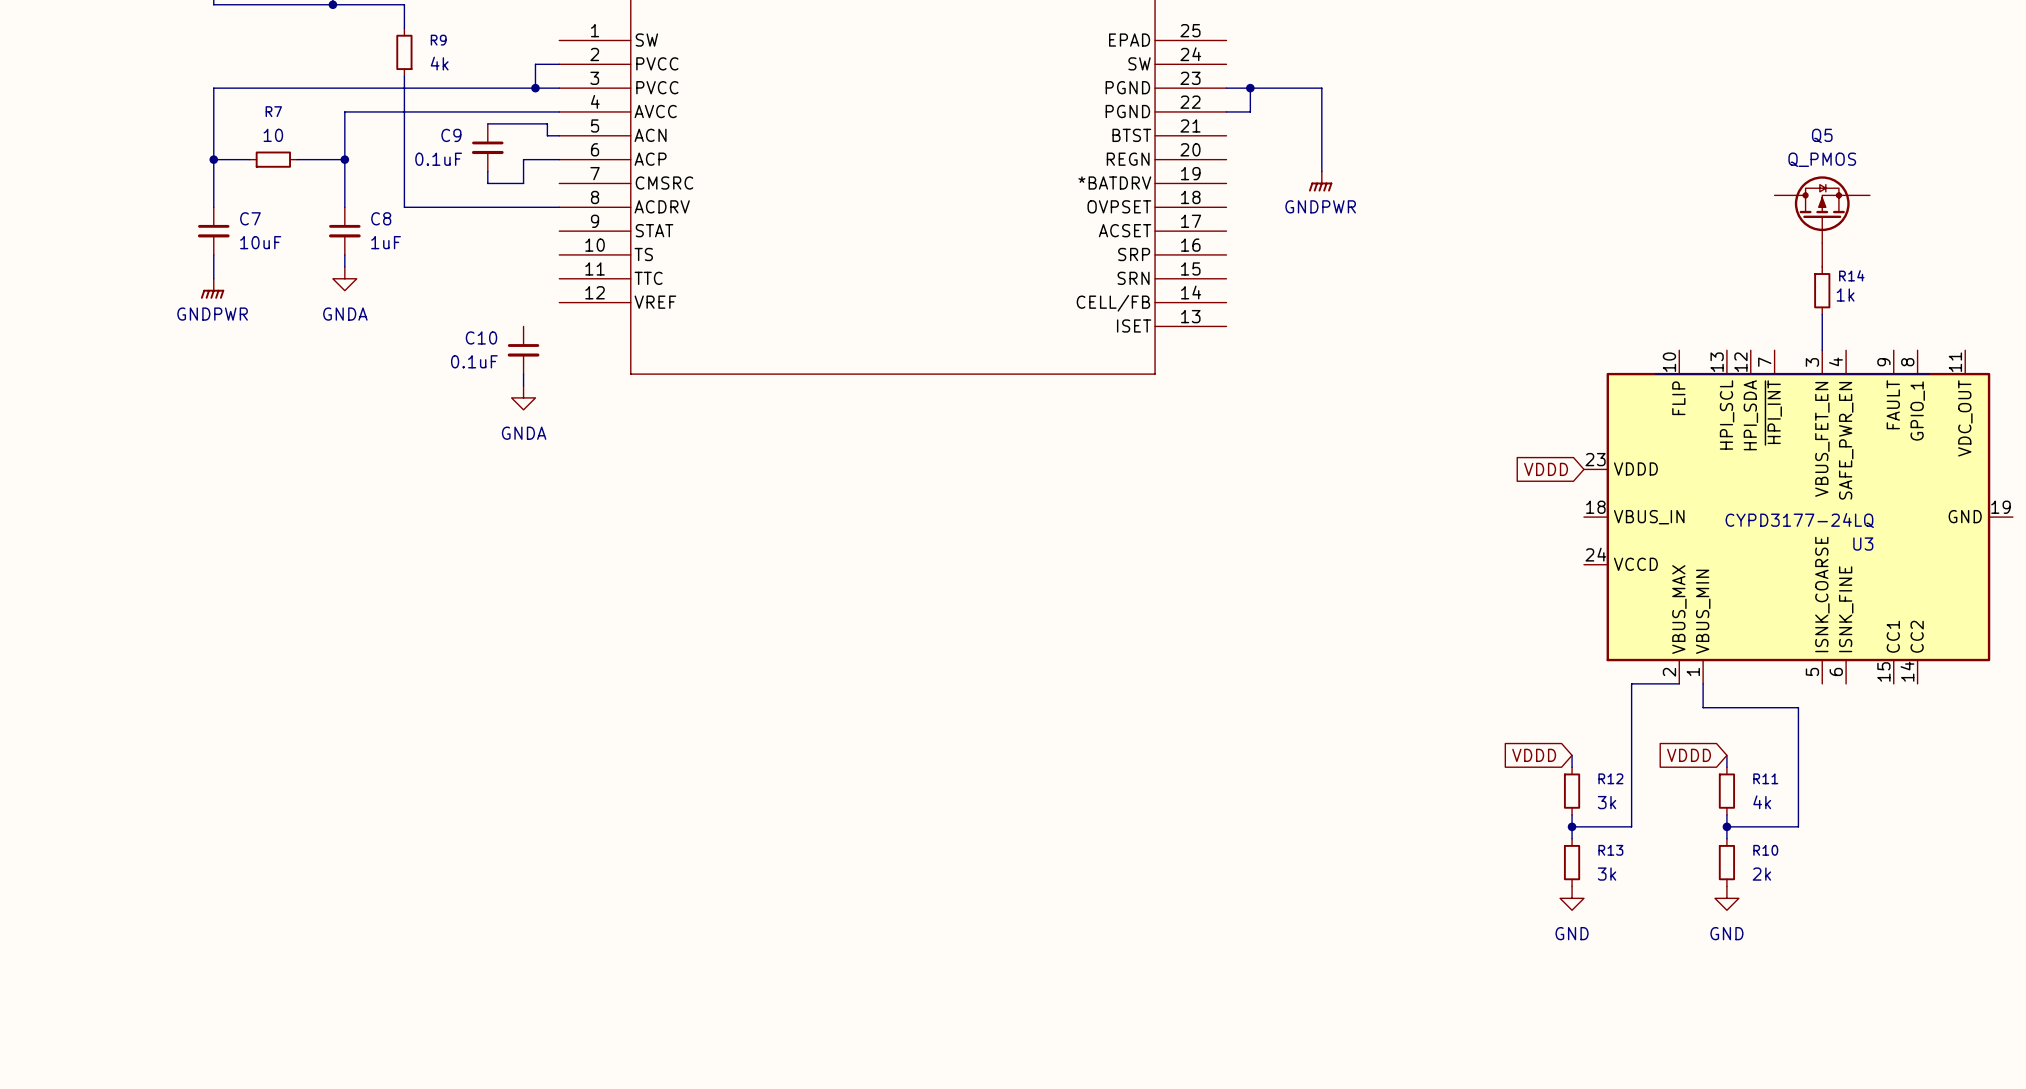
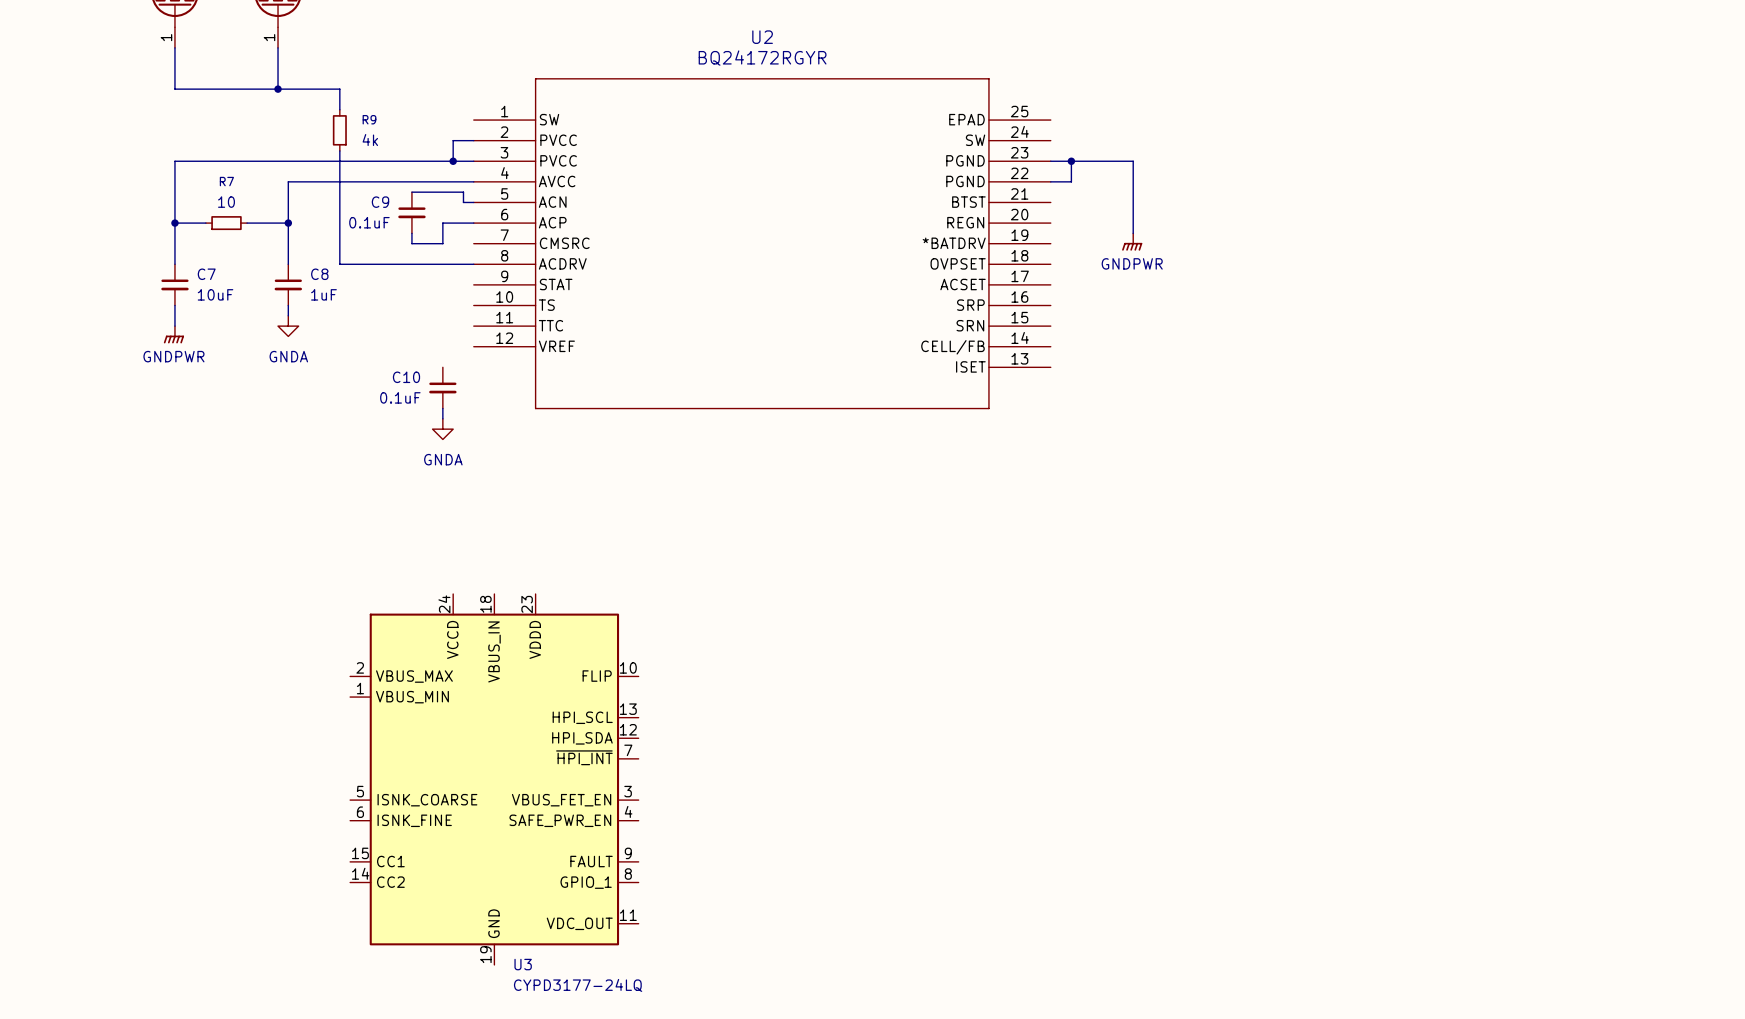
Q5: Q_PMOS (1822, 221) -> none
R14: 1k (1822, 290) -> none
wire: (1822, 314) (1822, 350) -> none
wire: (1655, 374) (1929, 374) -> none
global label: VDDD (1546, 469) -> none
U3 rotation: 0° (1798, 517) -> 90° clockwise (494, 779)
U3 position: (1798, 517) -> (494, 779)
U3 value position: CYPD3177-24LQ (1799, 520) -> CYPD3177-24LQ (578, 985)
U3 name position: U3 (1863, 544) -> U3 (523, 964)
wire: (1679, 683) (1631, 683) (1631, 826) (1572, 826) -> none
wire: (1703, 683) (1703, 707) (1798, 707) (1798, 826) (1726, 826) -> none
global label: VDDD (1534, 755) -> none
wire: (1572, 755) (1572, 767) -> none
global label: VDDD (1689, 755) -> none
wire: (1726, 755) (1726, 767) -> none
R12: 3k (1572, 791) -> none
R11: 4k (1726, 791) -> none
wire: (1572, 814) (1572, 838) -> none
wire: (1726, 814) (1726, 838) -> none
junction: (1572, 826) -> none
junction: (1726, 826) -> none
R13: 3k (1572, 862) -> none
R10: 2k (1726, 862) -> none
power symbol: GND (1572, 898) -> none
power symbol: GND (1726, 898) -> none

